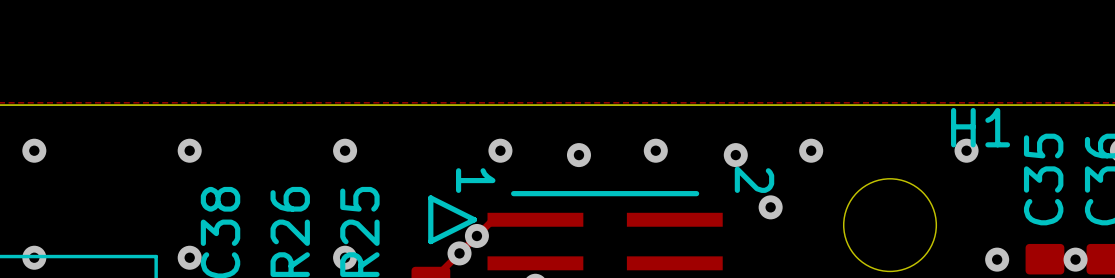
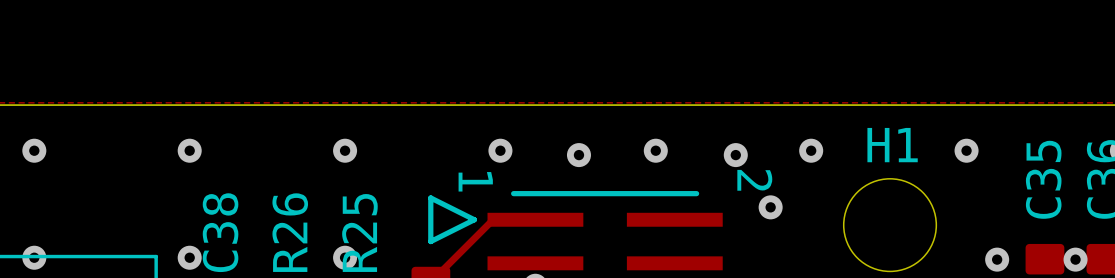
H1 name position: H1 (980, 127) -> H1 (892, 145)
via: (476, 235) -> none
via: (459, 253) -> none

